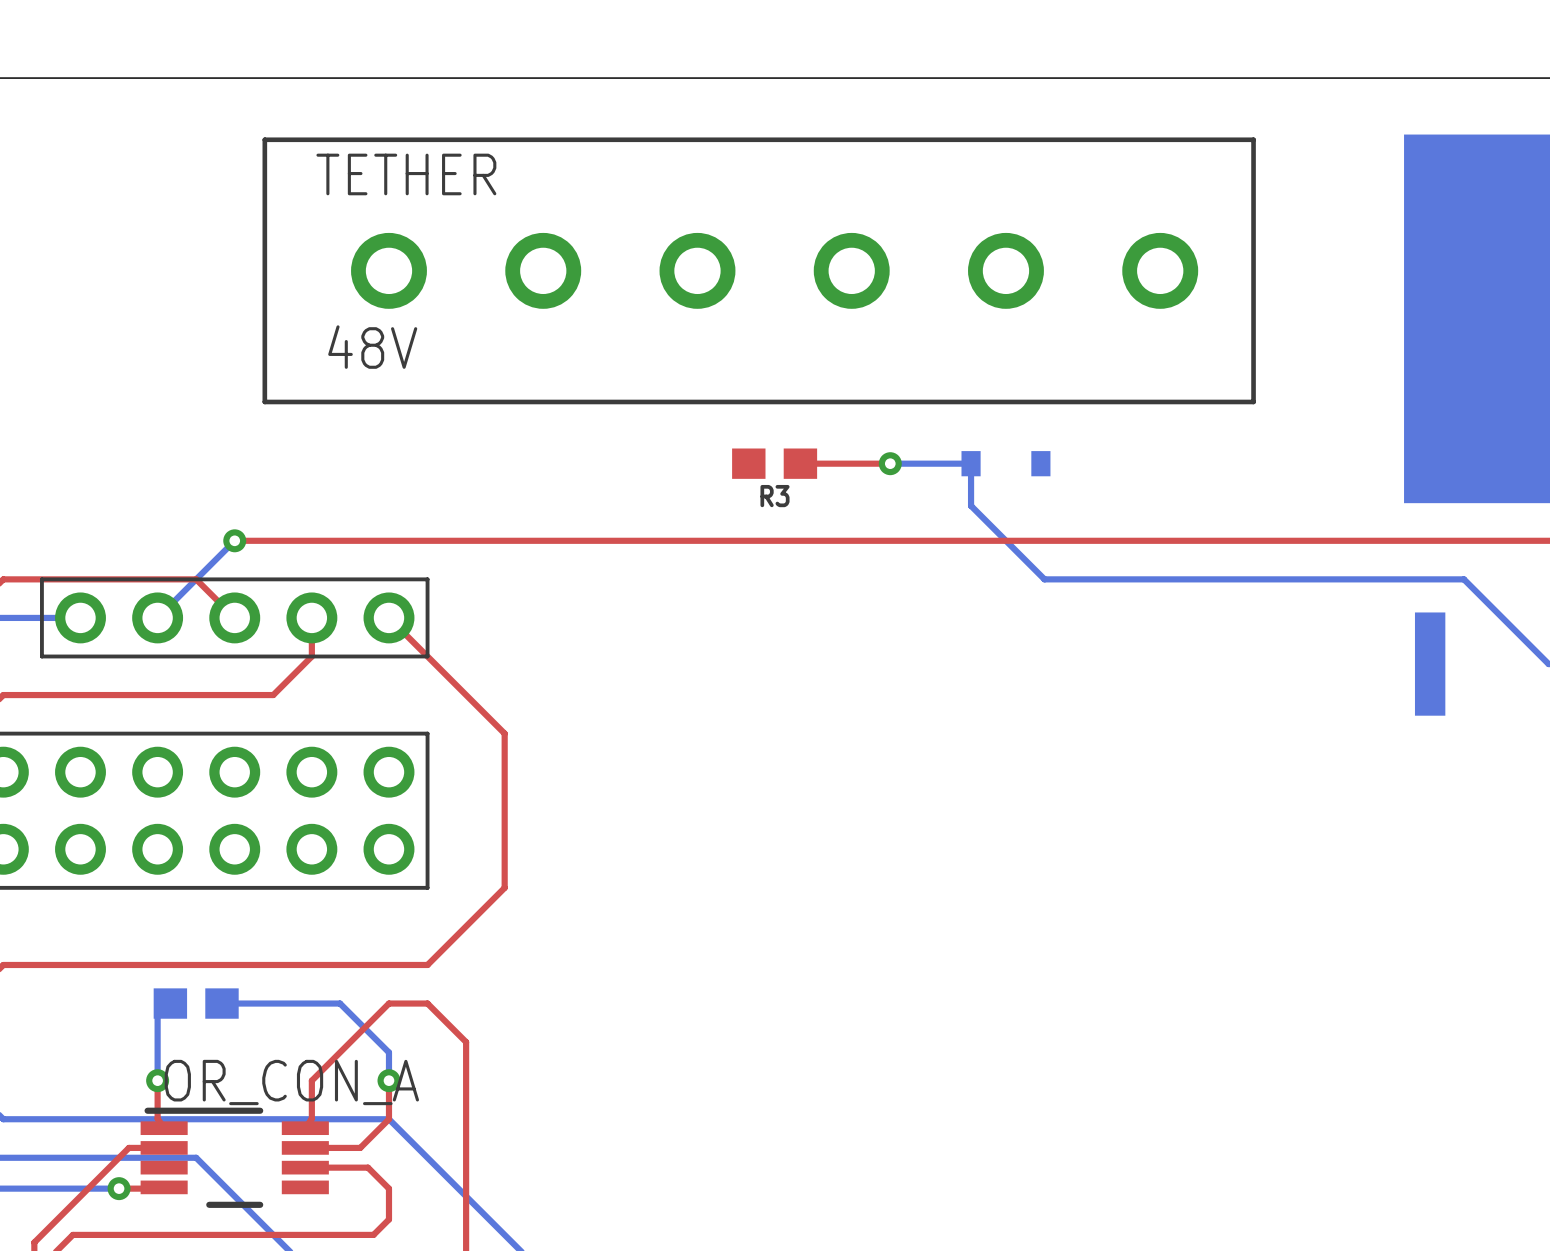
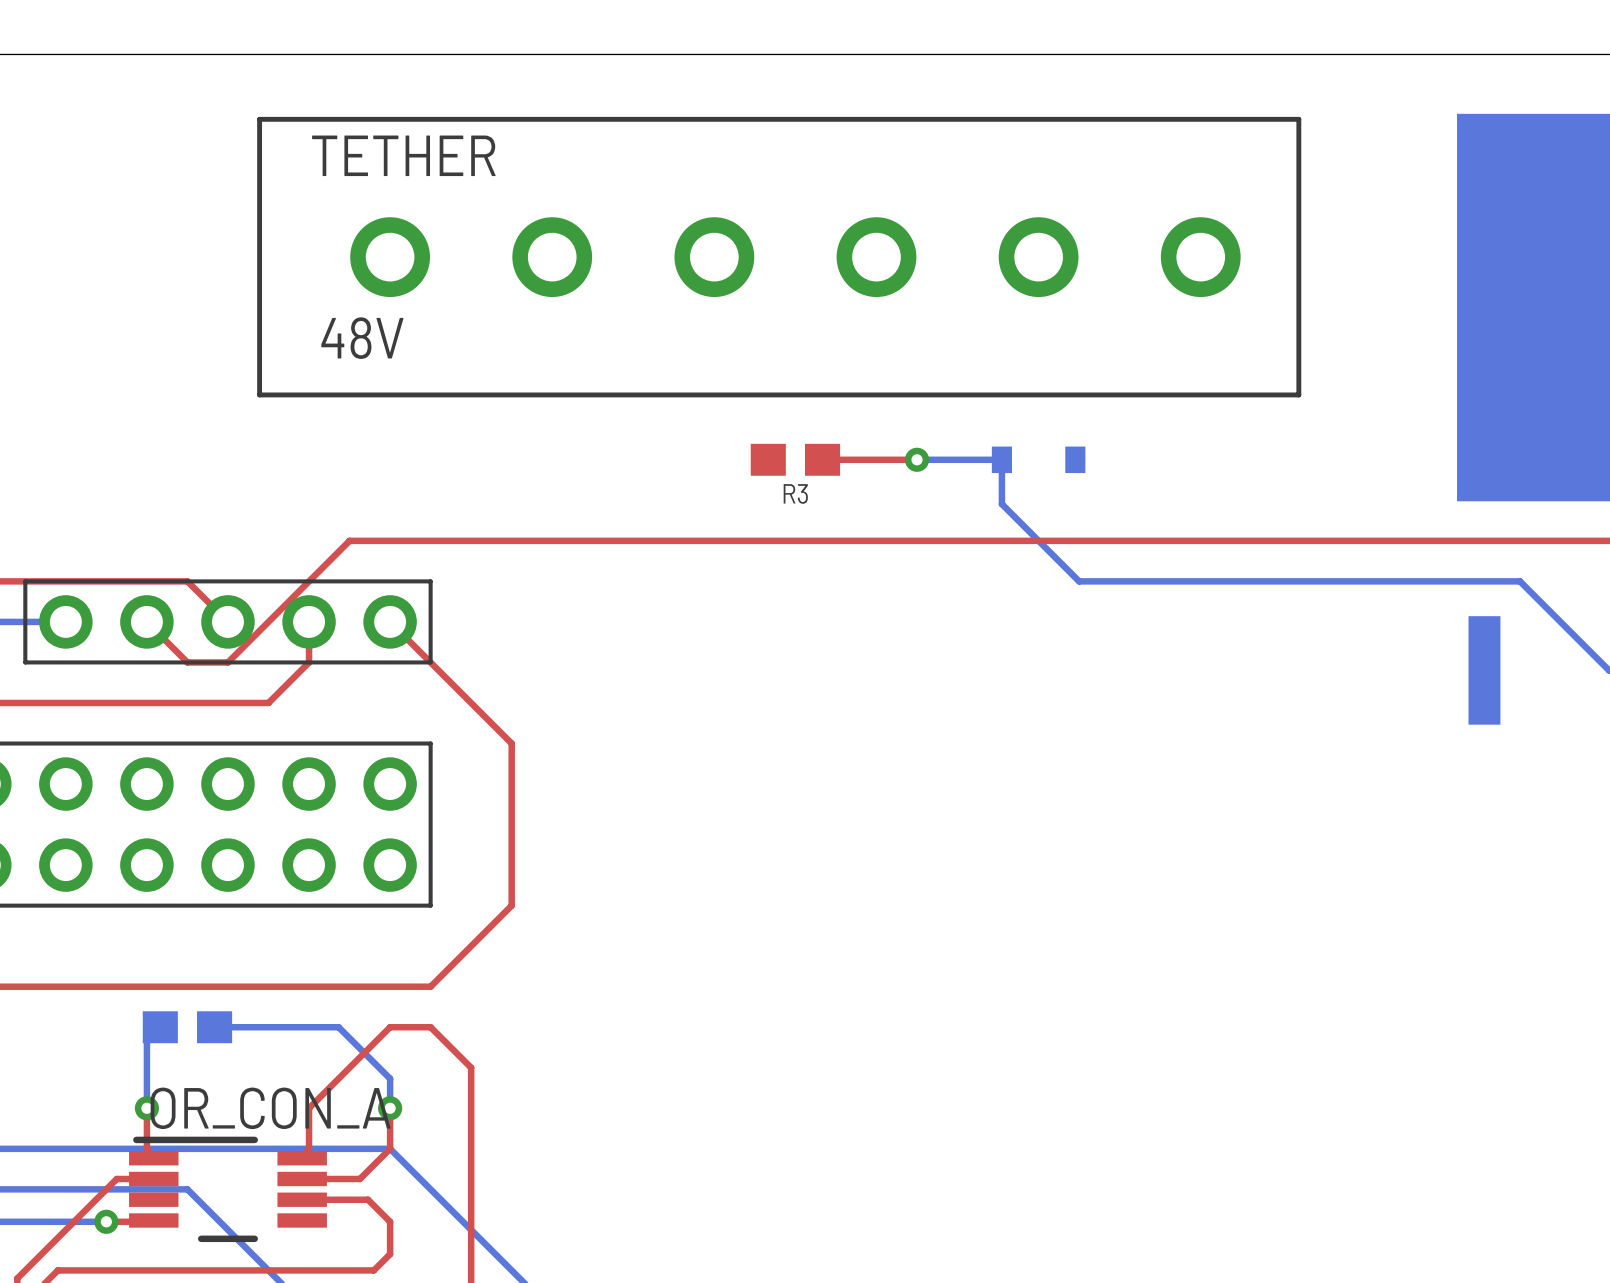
top track: (234, 540) (350, 540) -> (146, 621) (187, 662) (227, 662) (349, 540)
bottom track: (234, 540) (157, 617) -> none
via: (234, 540) -> none

